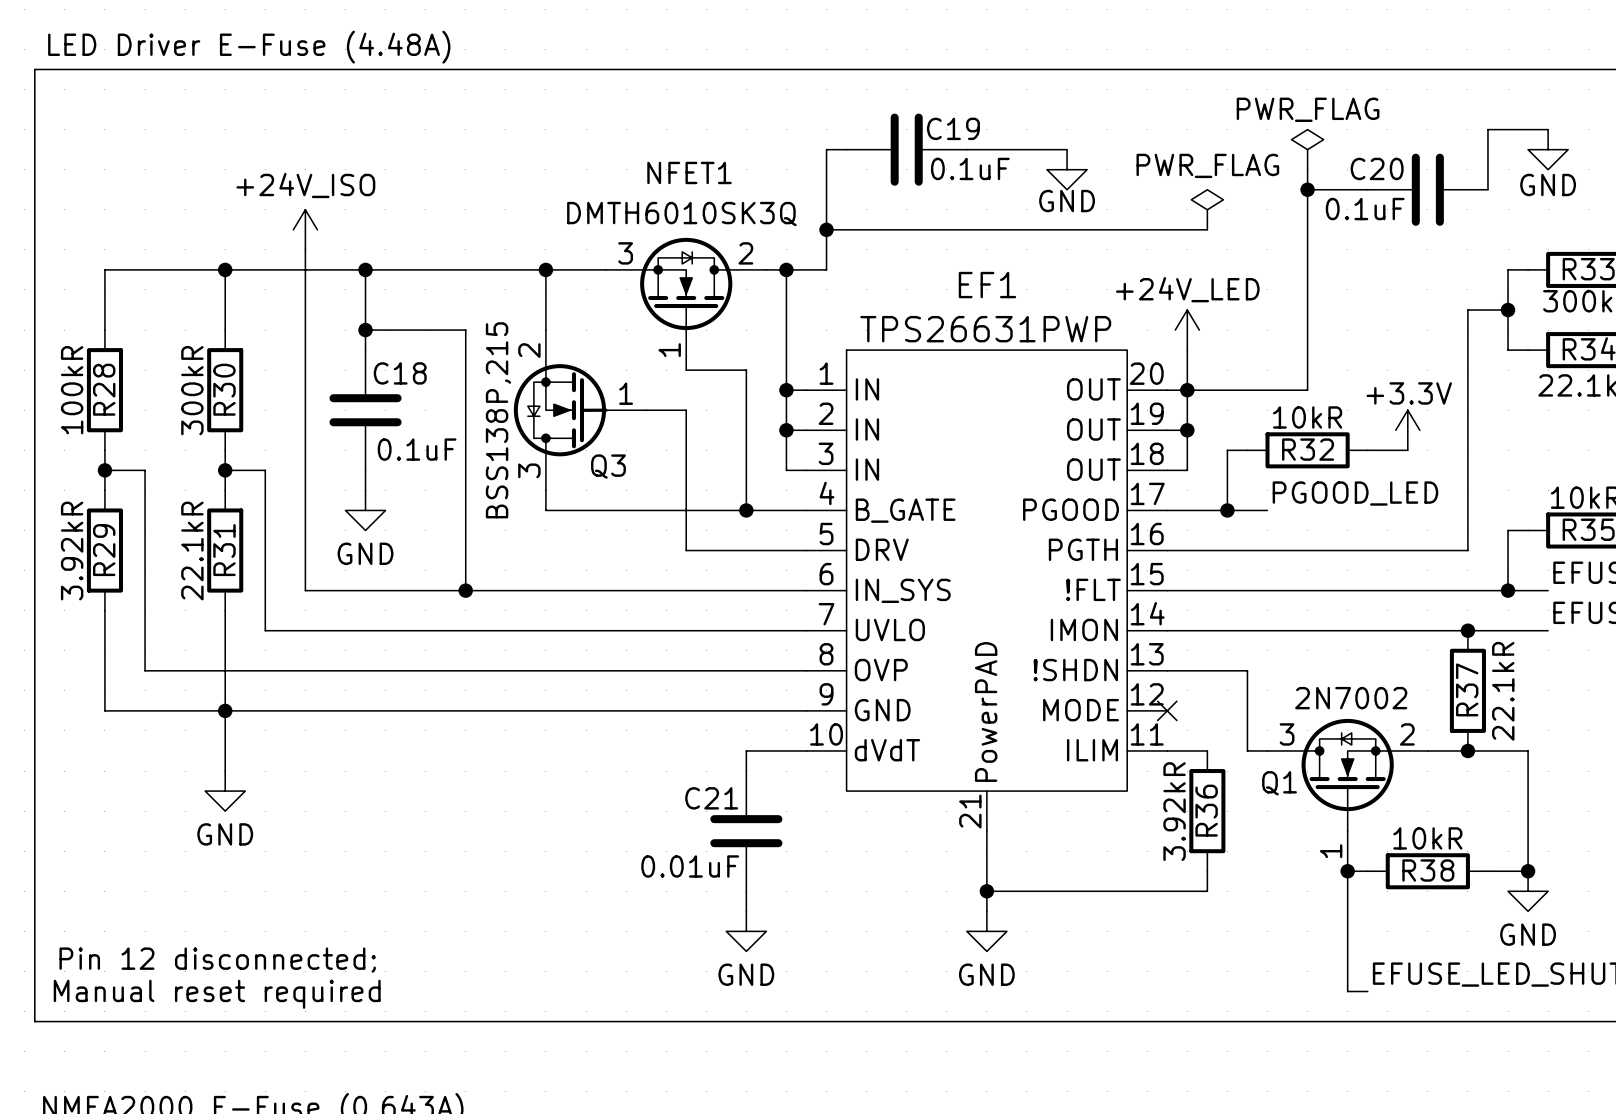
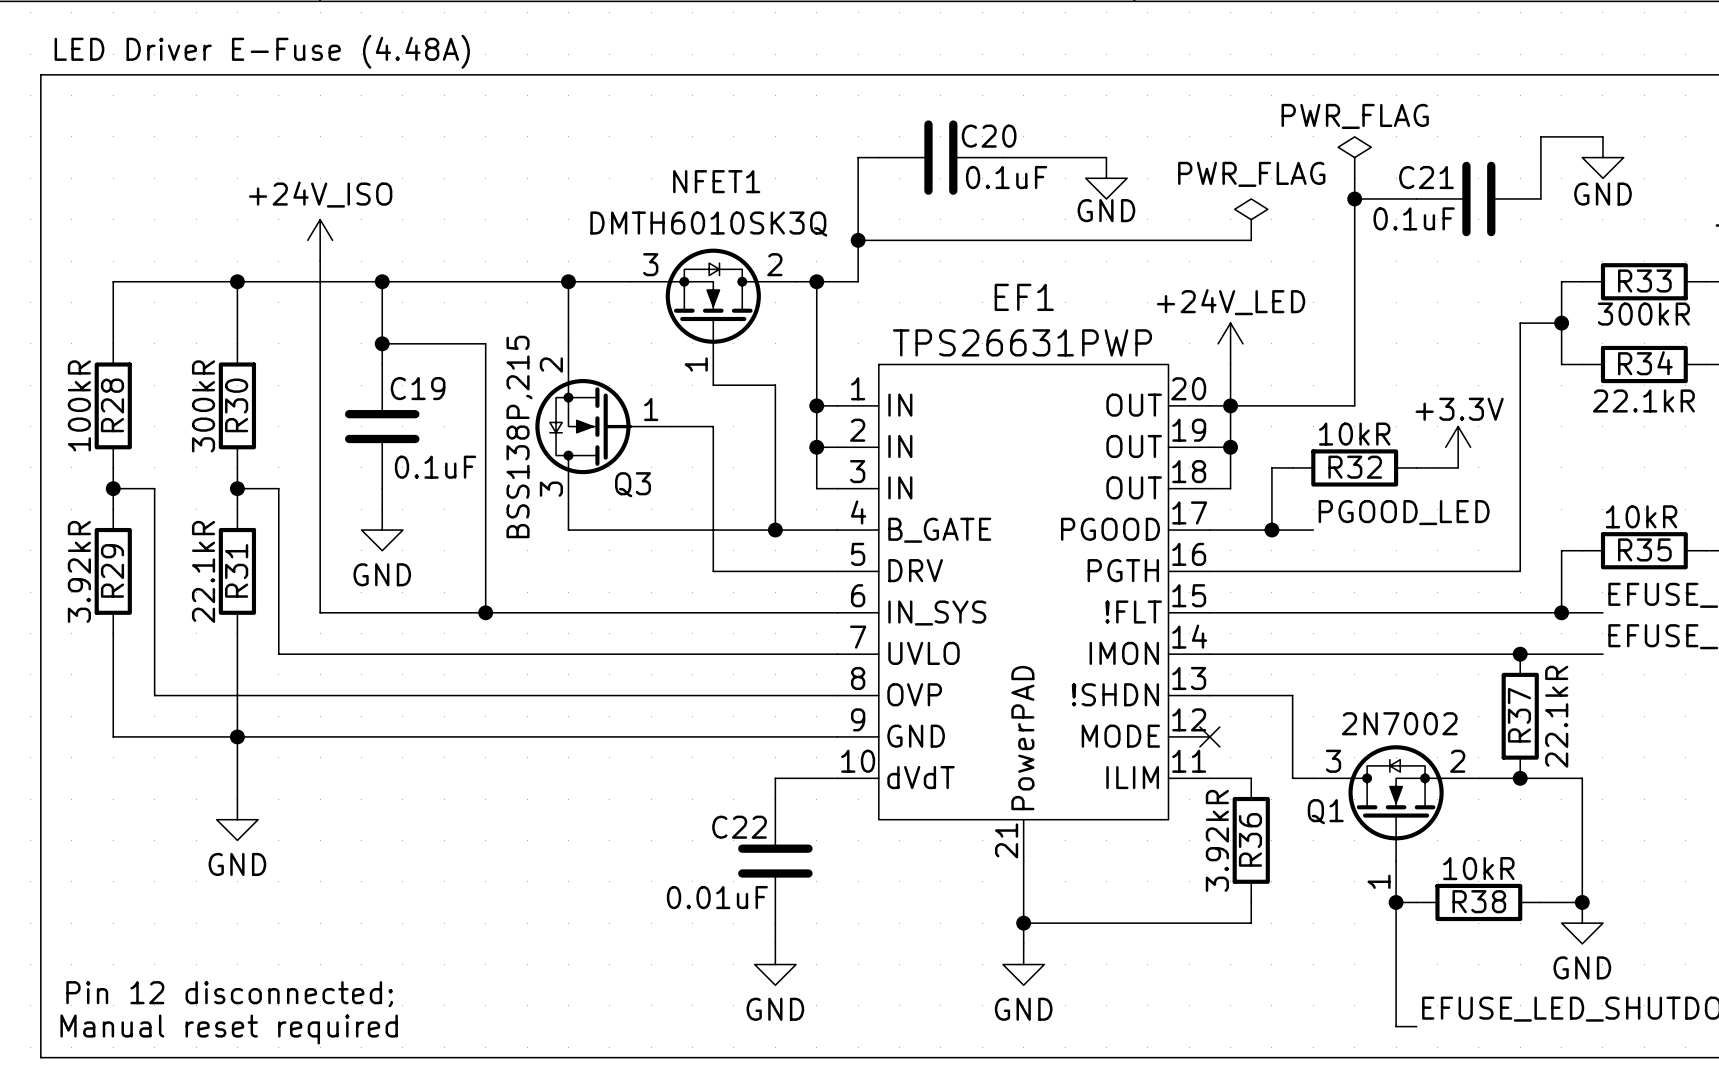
C19 name: C19 (953, 128) -> C20 (989, 136)
C20 name: C20 (1377, 168) -> C21 (1426, 177)
C18 name: C18 (400, 373) -> C19 (418, 388)
C21 name: C21 (711, 798) -> C22 (739, 827)

